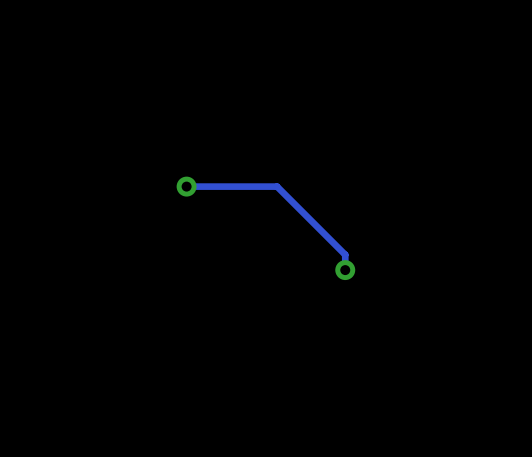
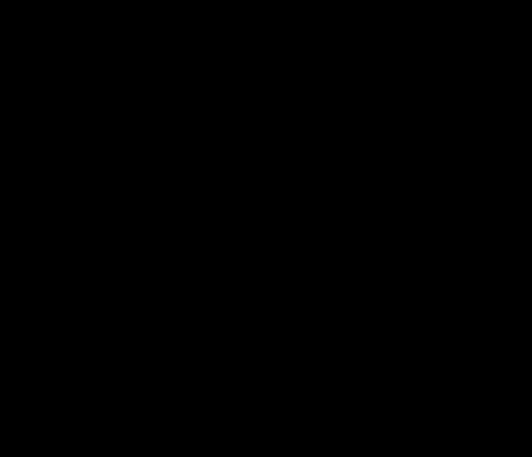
track: (186, 186) (277, 186) (345, 254) (345, 270) -> none
via: (186, 186) -> none
via: (345, 270) -> none

